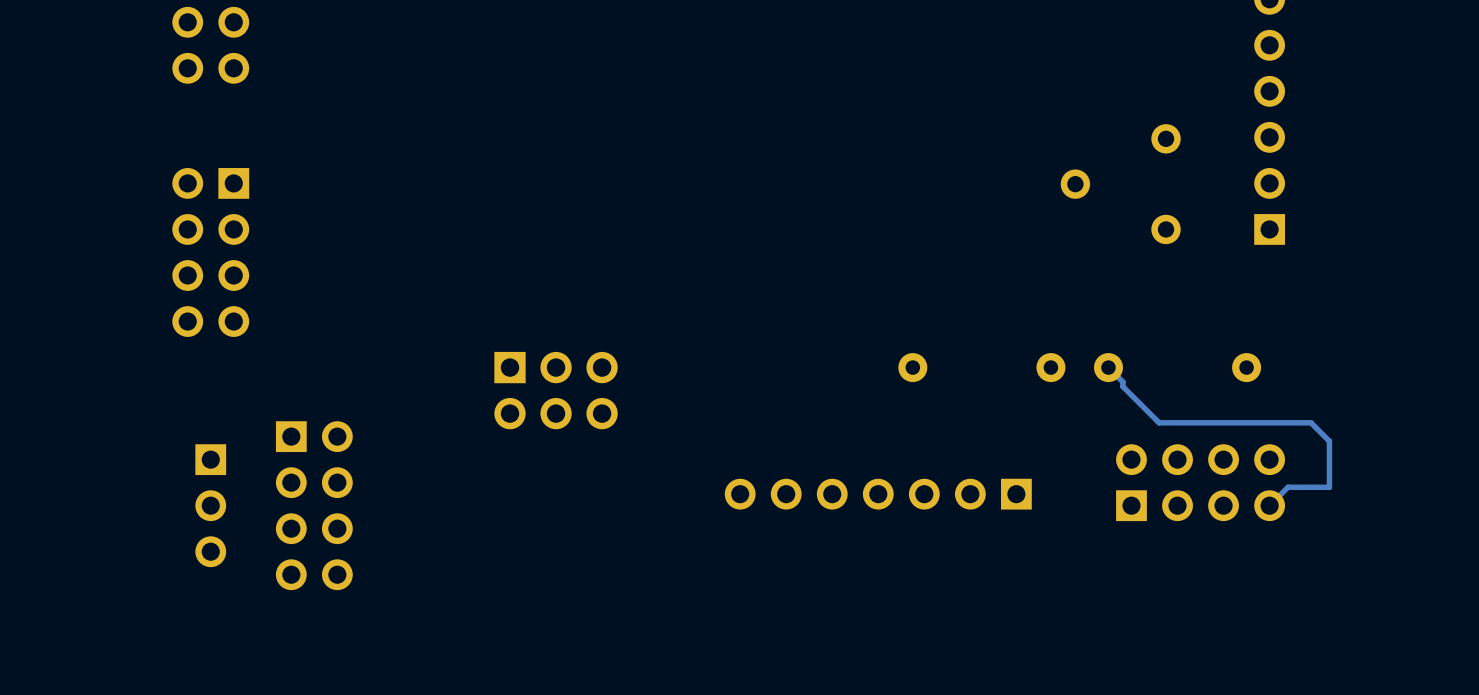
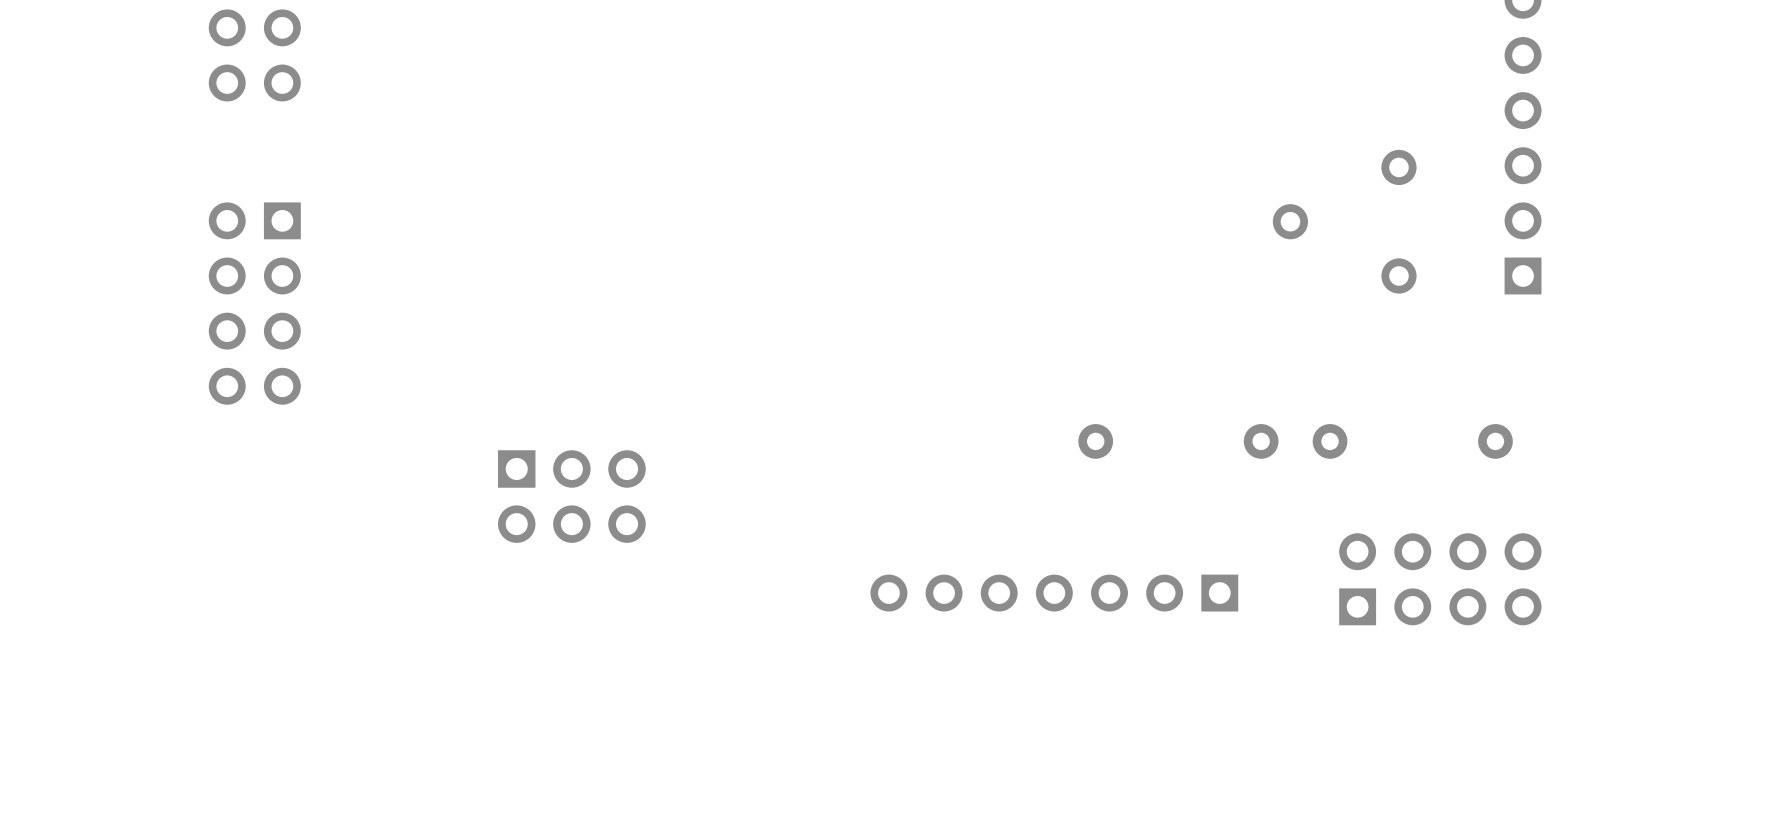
track: (1108, 367) (1122, 382) (1122, 386) (1159, 422) (1311, 422) (1329, 441) (1329, 487) (1288, 487) (1269, 505) -> none
part position: (556, 390) -> (571, 496)
part: (210, 505) -> none
part: (314, 505) -> none

